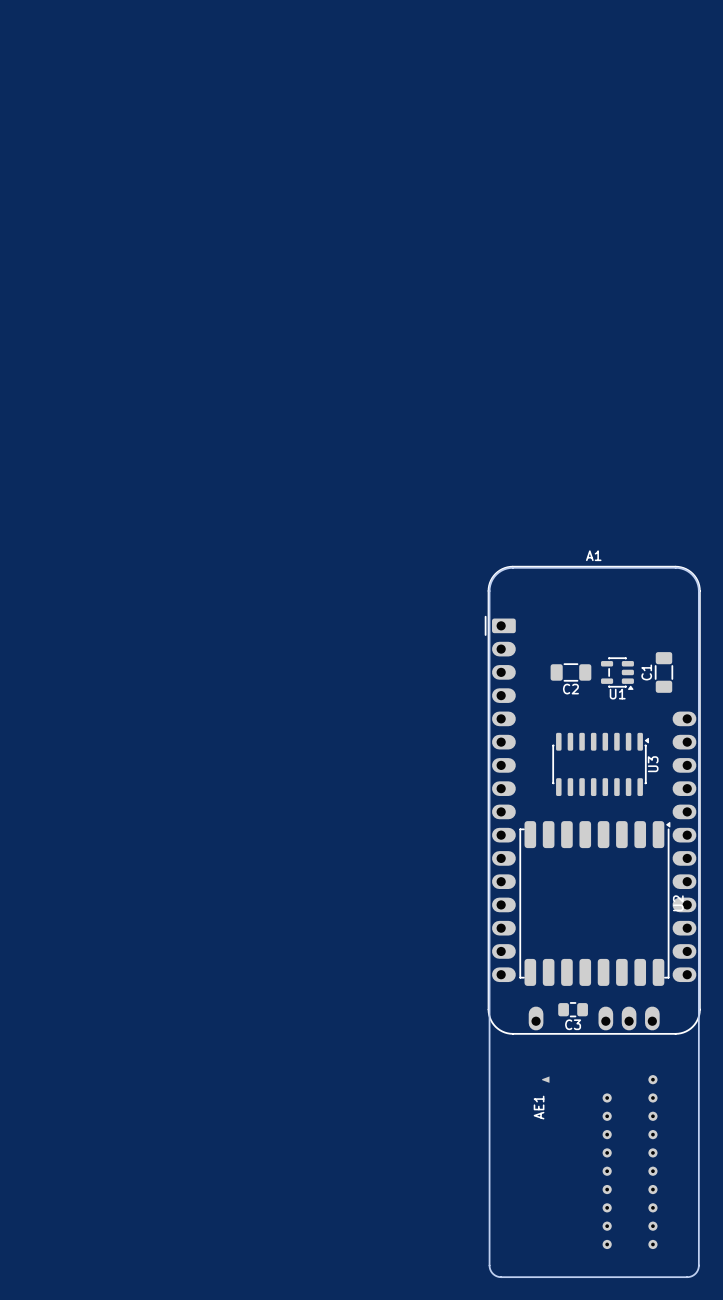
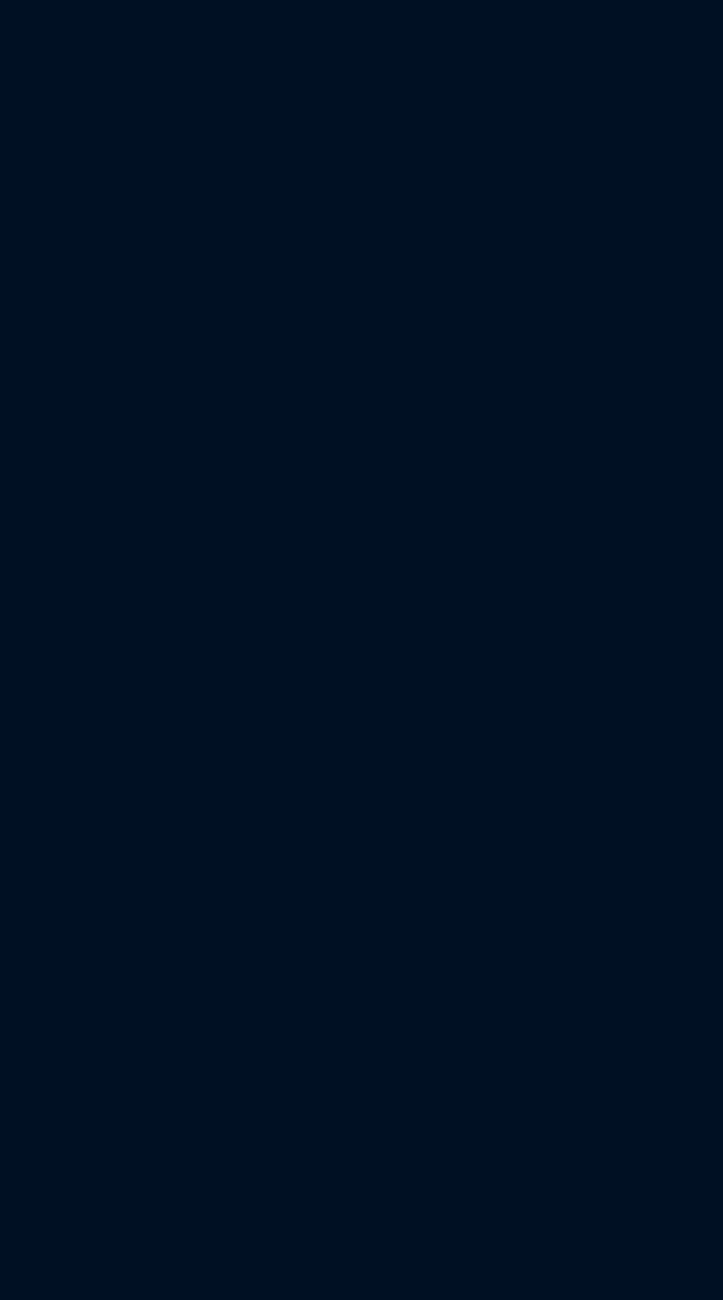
board edge: (512, 567) (678, 568) (692, 574) (698, 585) (698, 1265) (696, 1272) (689, 1276) (501, 1277) (493, 1274) (489, 1268) (489, 591) (491, 582) (496, 574) (503, 569) (512, 567) -> none
C2: (570, 672) -> none
C1: (663, 672) -> none
U1: (617, 673) -> none
U3: (600, 764) -> none
A1: (592, 800) -> none
part: (595, 903) -> none
C3: (573, 1009) -> none
AE1: (599, 1162) -> none

